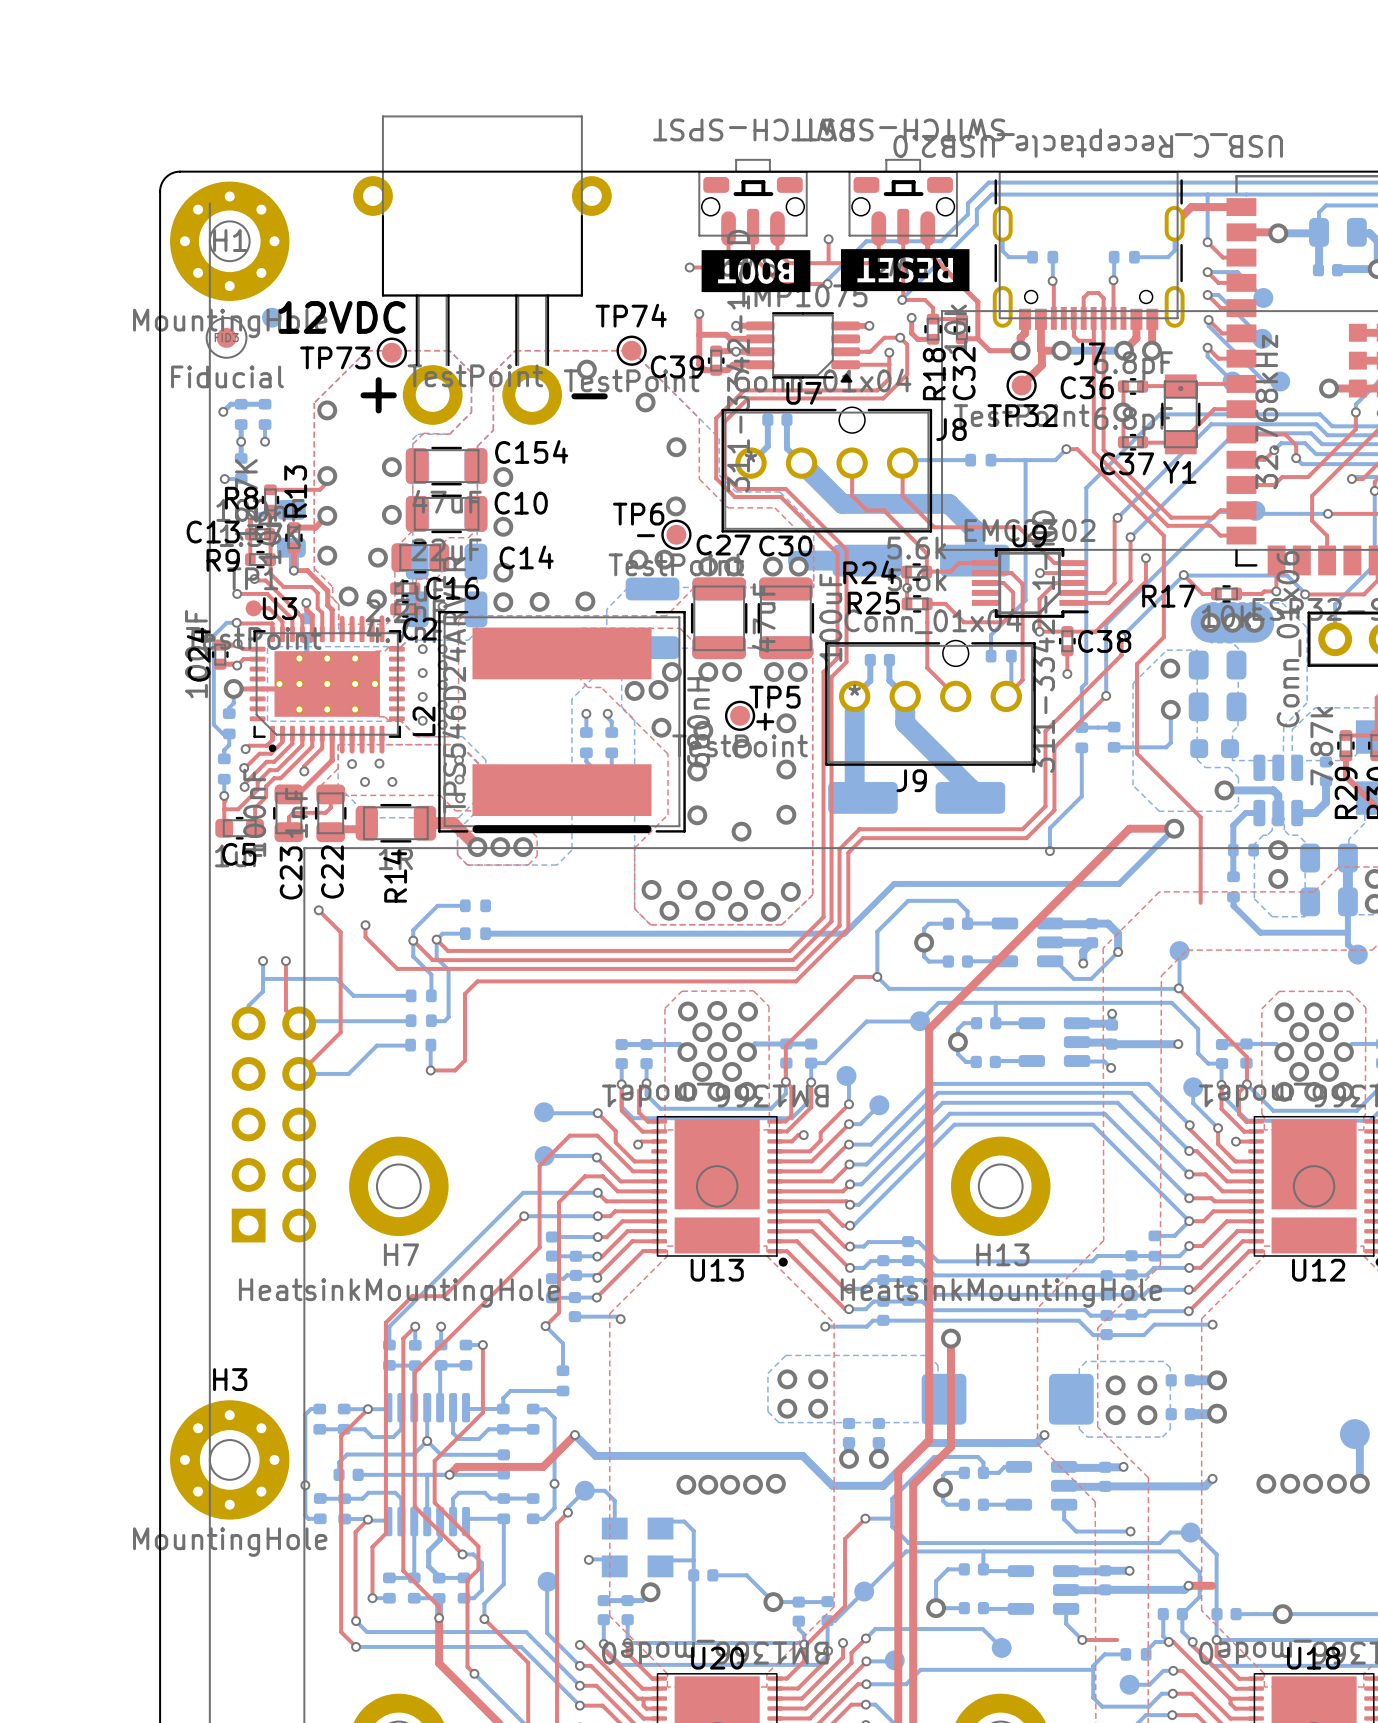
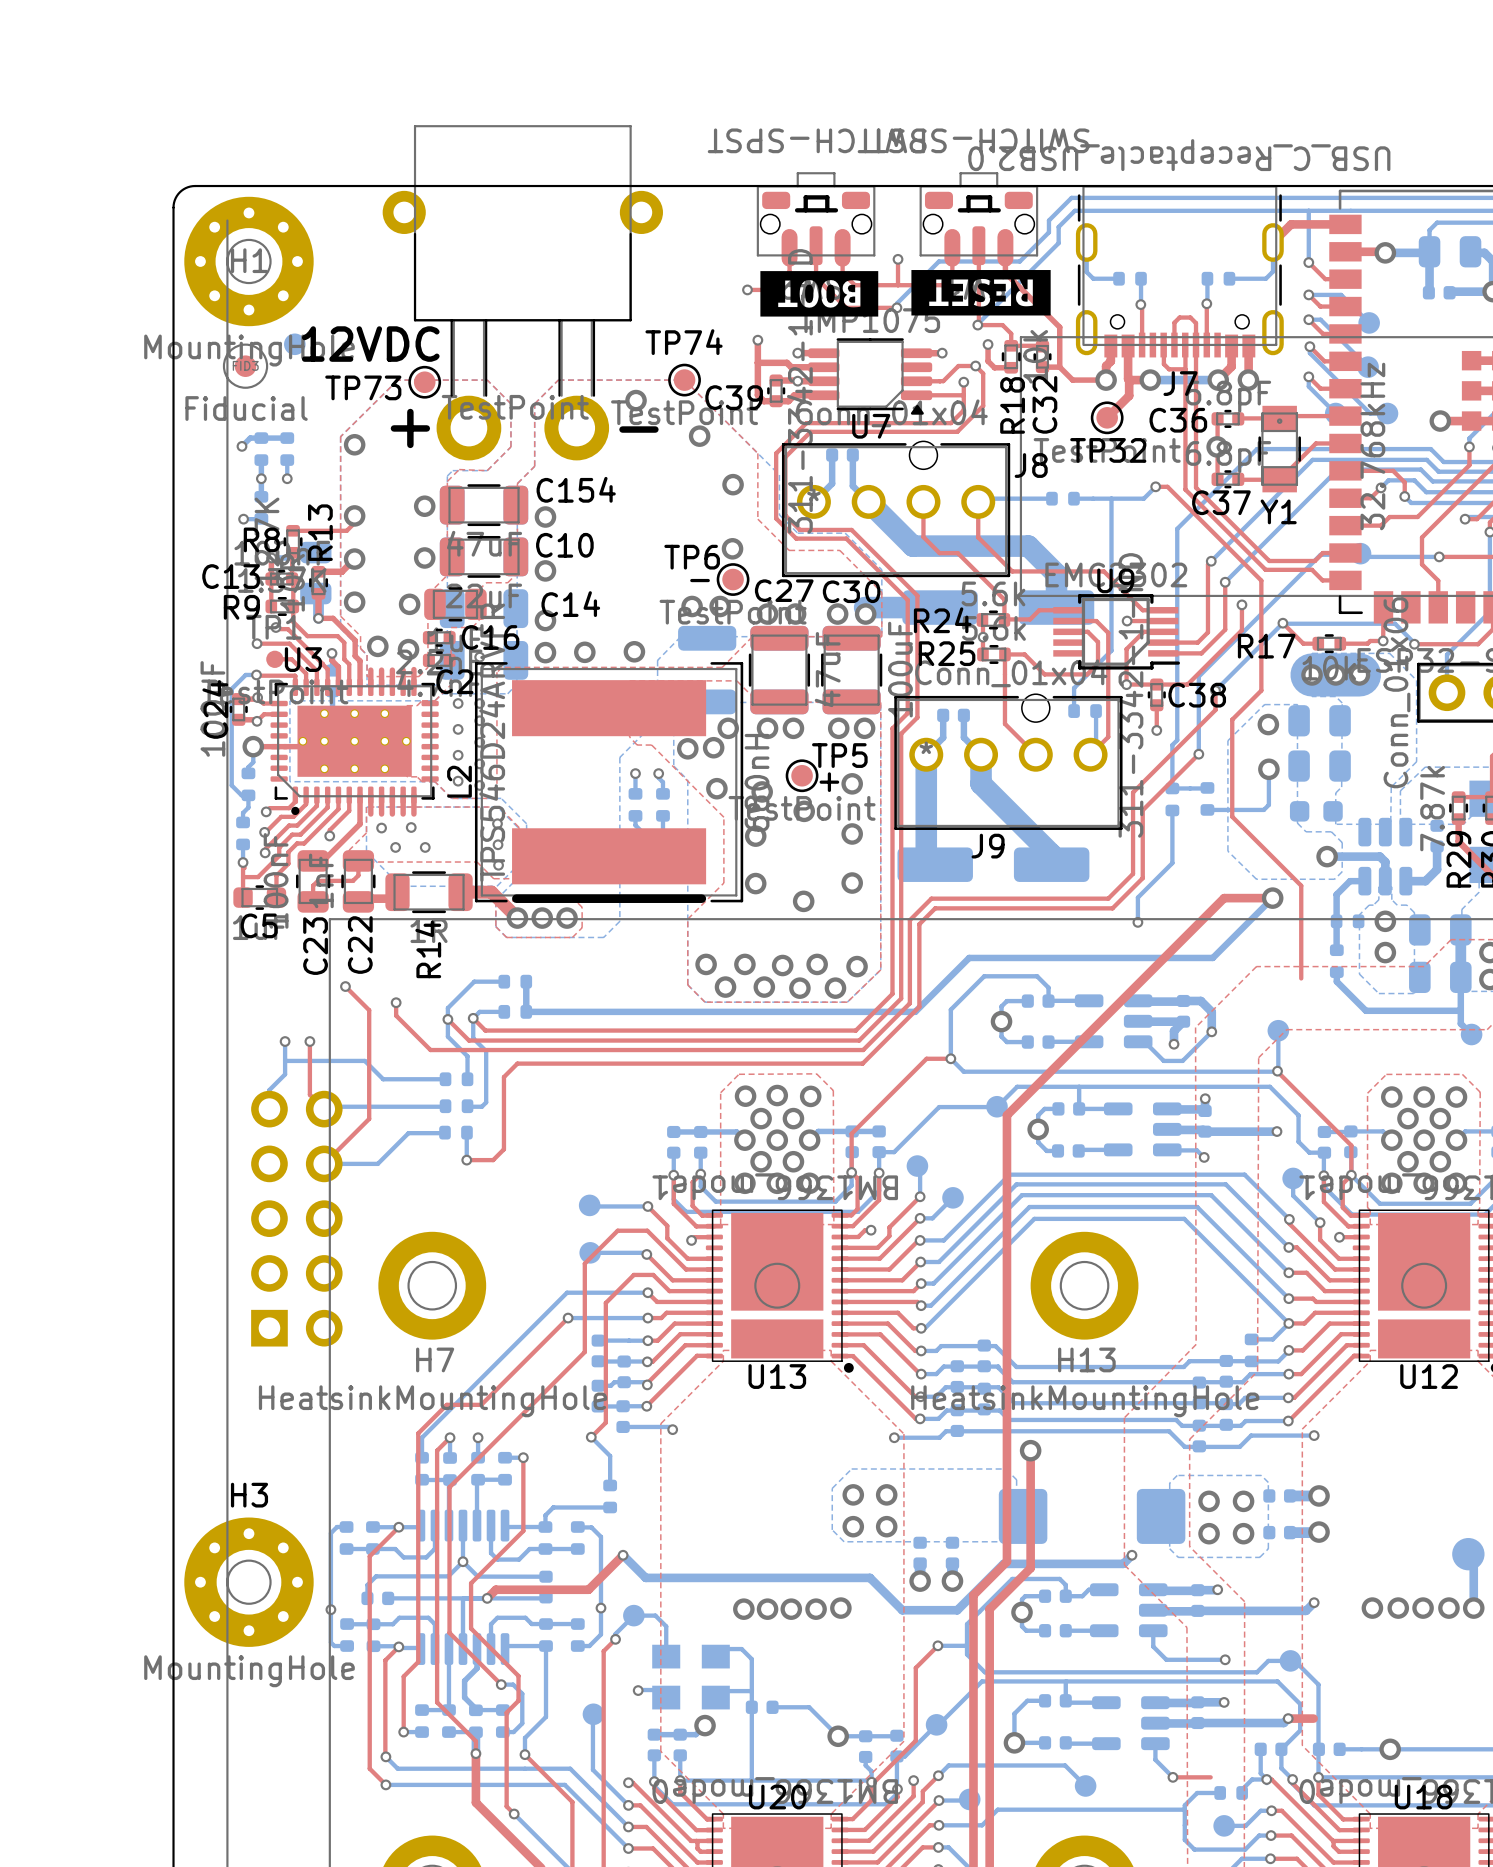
bottom track: none -> (526, 981) (526, 1011)

